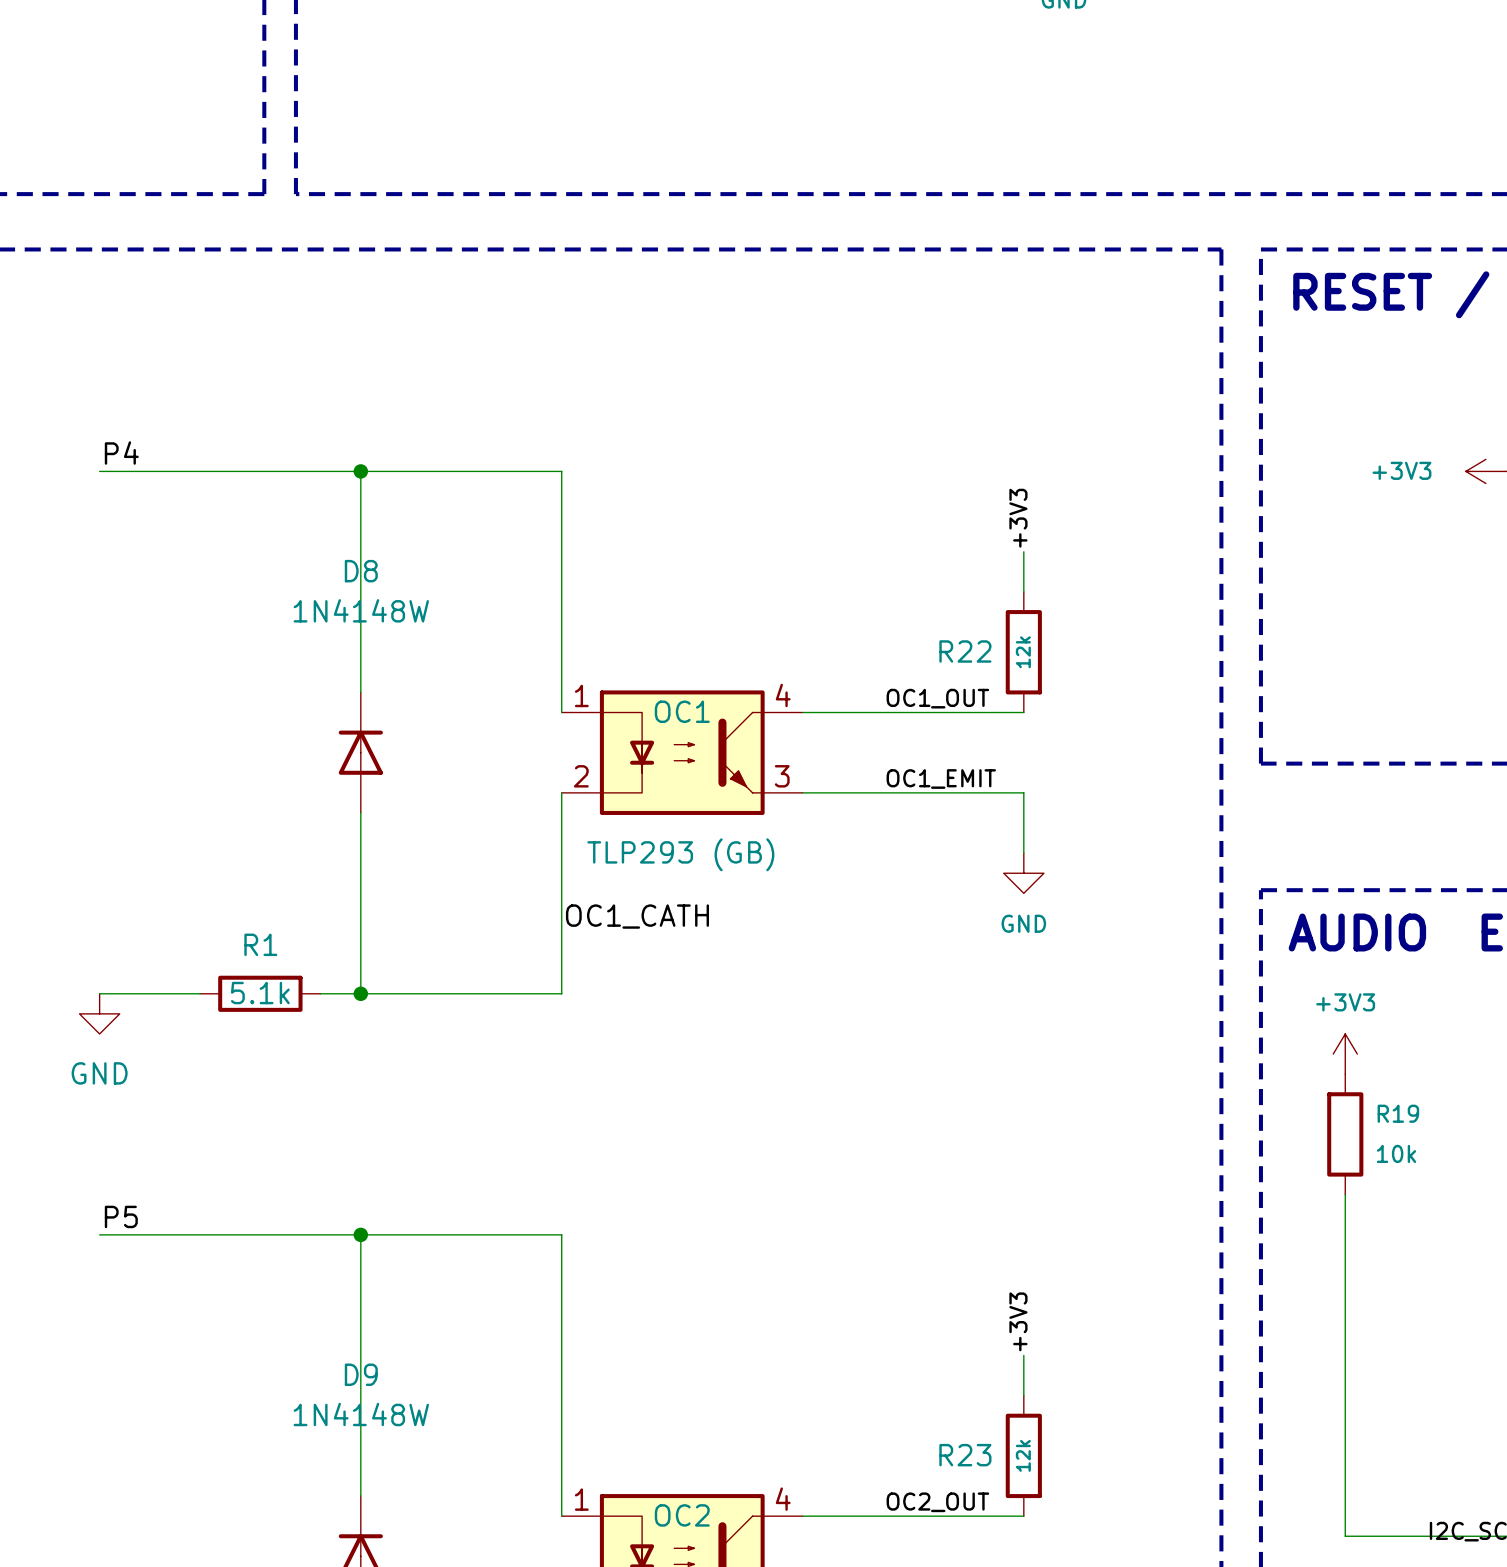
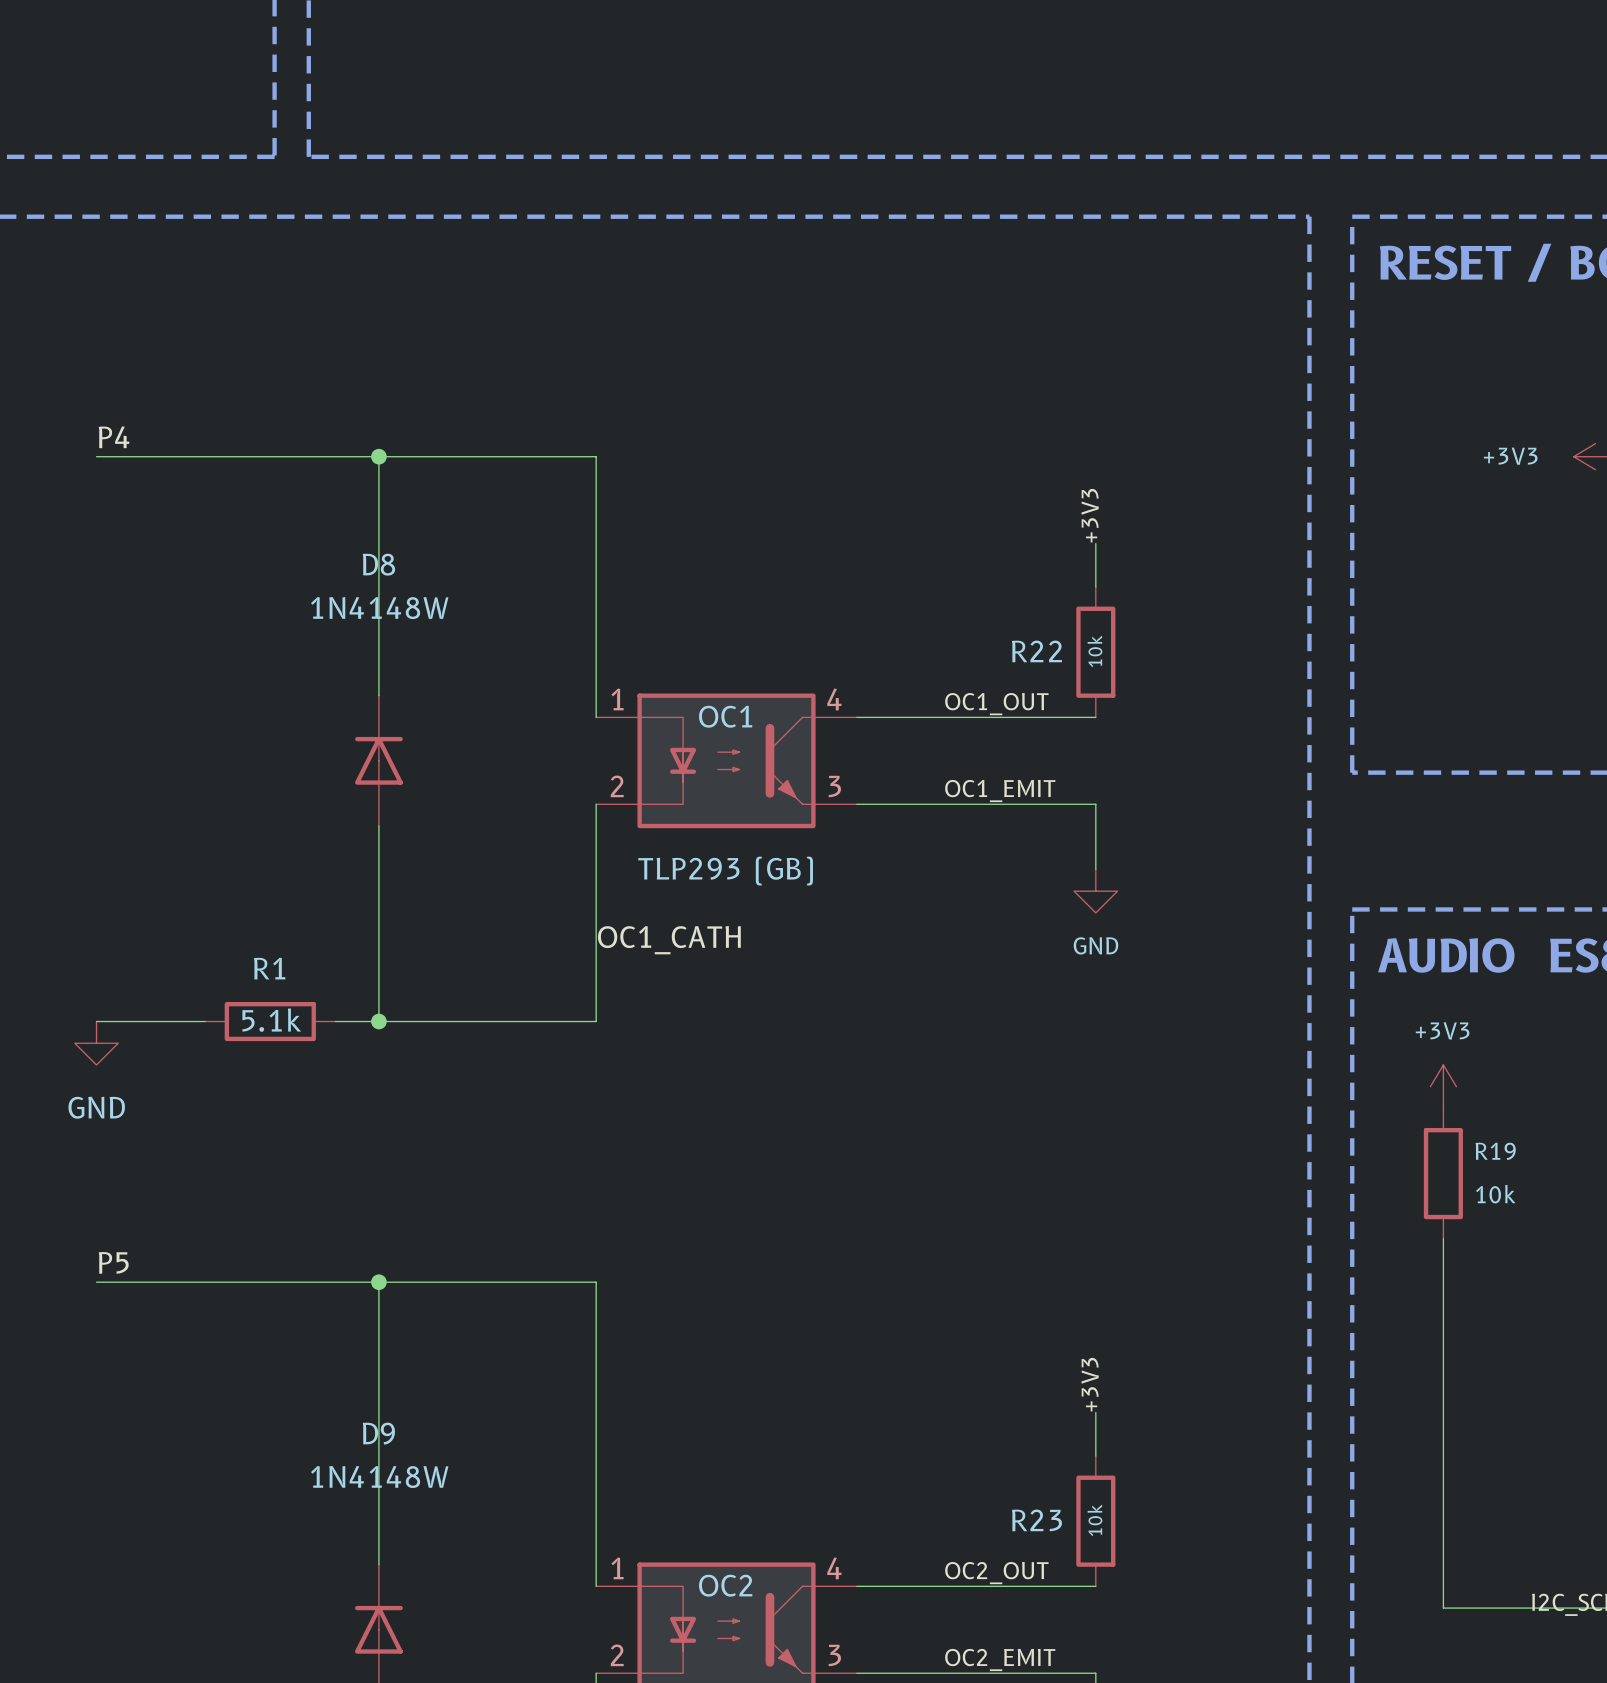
R22 value: 12k (1023, 652) -> 10k (1094, 651)
R23 value: 12k (1023, 1455) -> 10k (1094, 1520)

